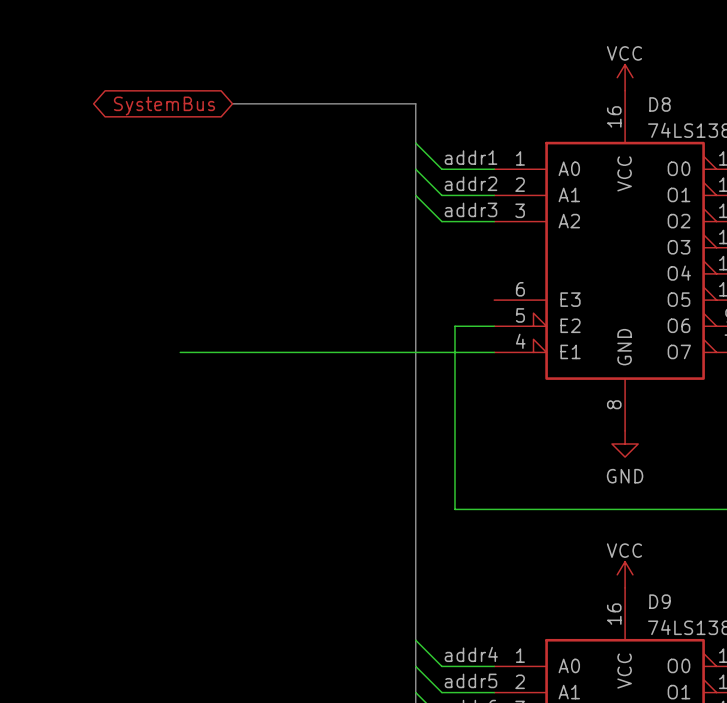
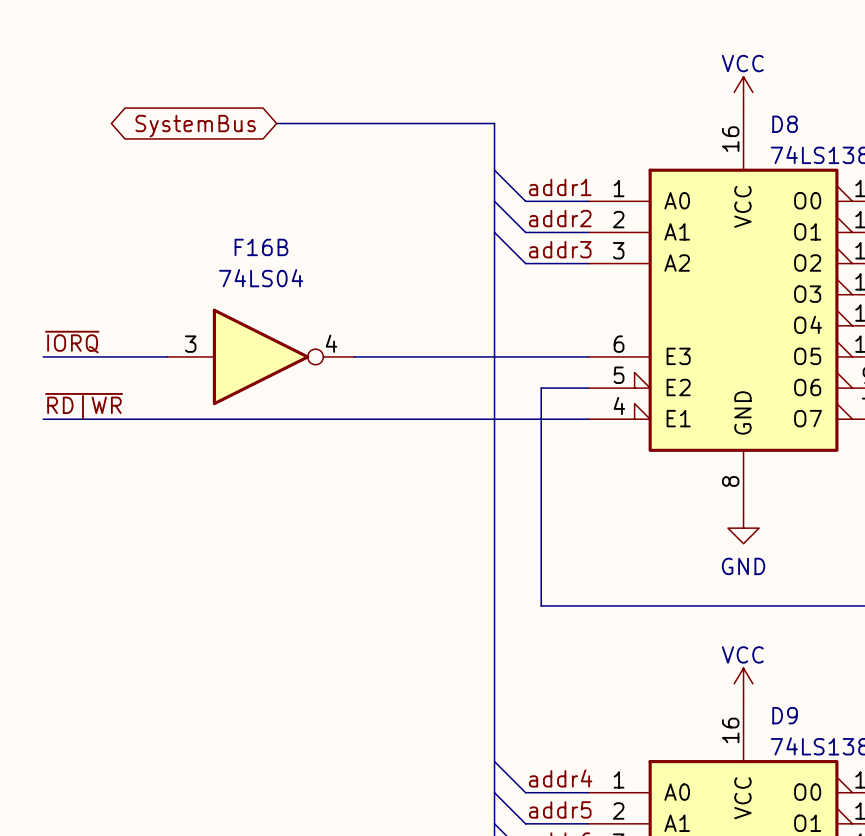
label: none -> ~{IORQ} (72, 342)
wire: none -> (43, 356) (167, 356)
F16B: none -> 74LS04 (261, 356)
wire: none -> (354, 356) (587, 356)
label: none -> ~{RD|WR} (84, 406)
wire: none -> (43, 419) (214, 419)

